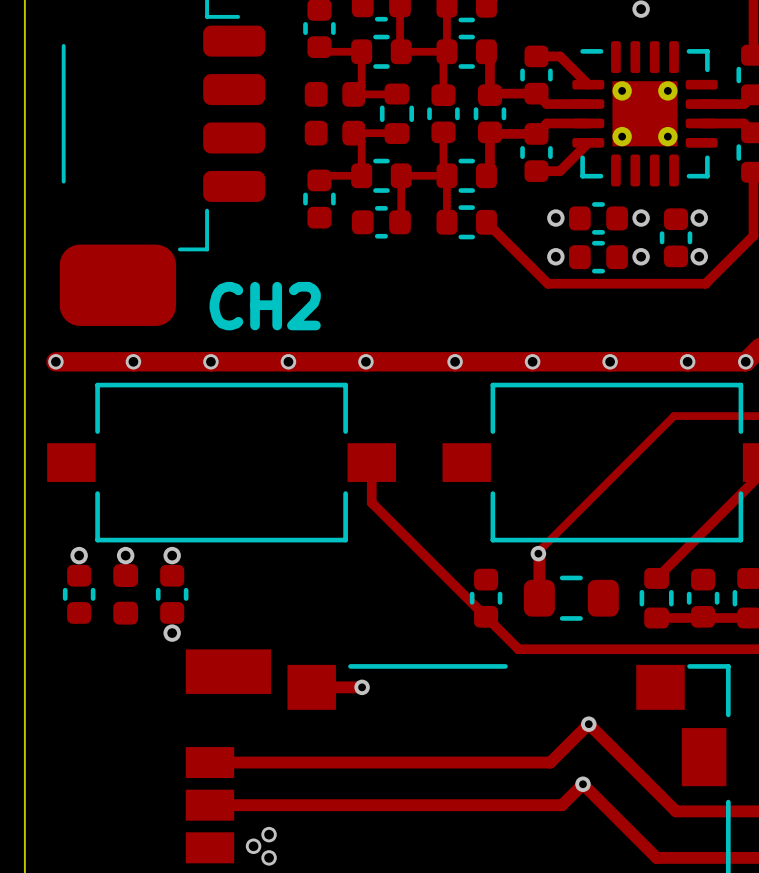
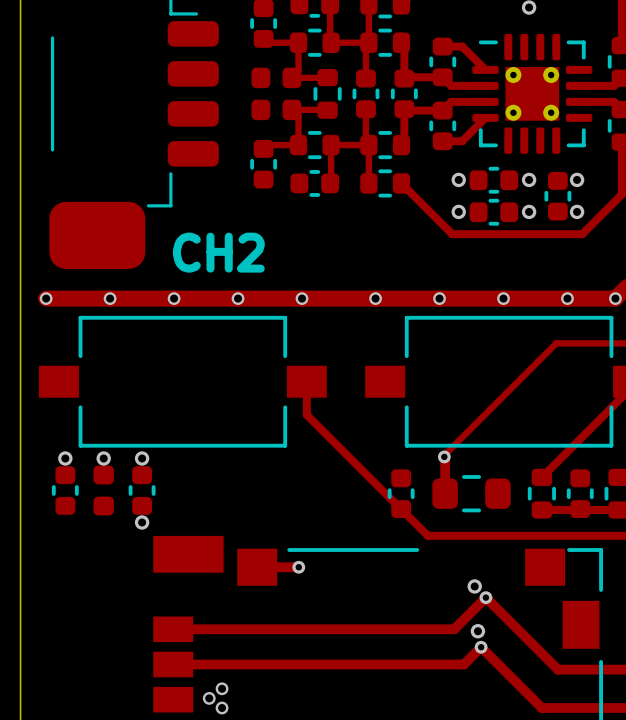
via: none -> (474, 586)
via: none -> (477, 631)

